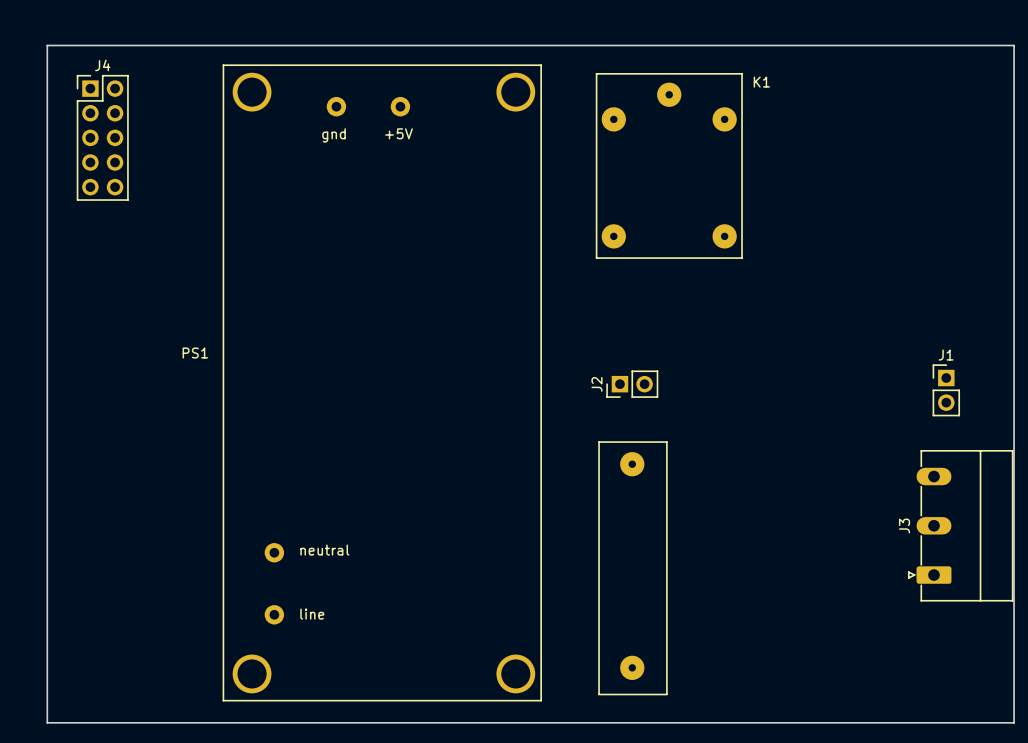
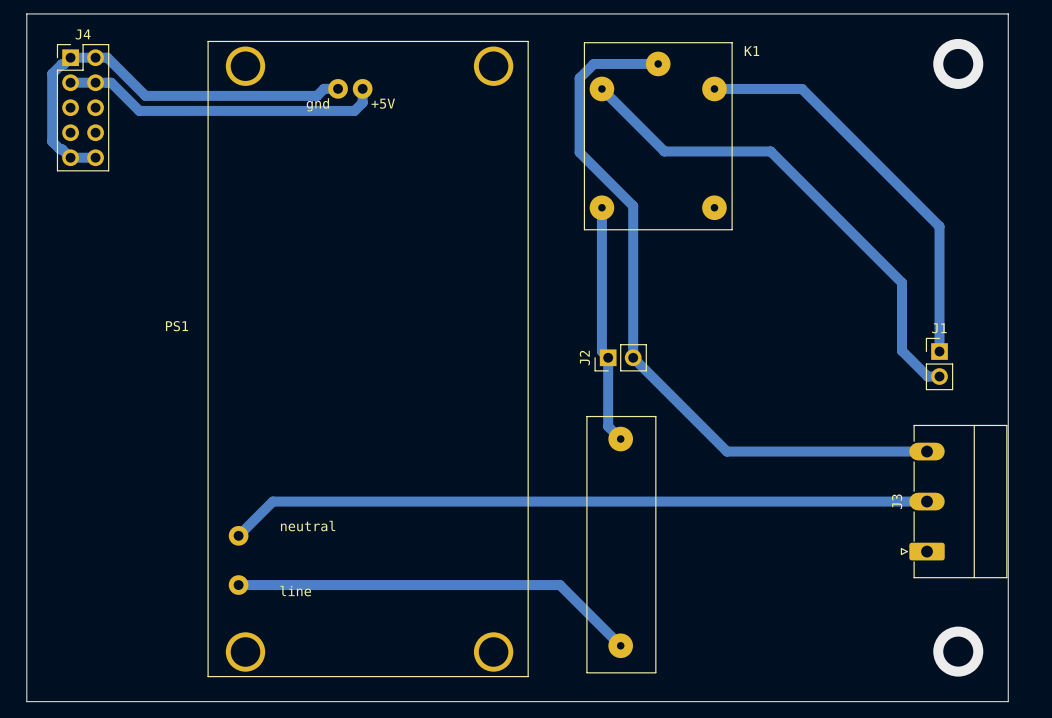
PS1 footprint: [222, 64, 542, 702] -> [207, 40, 529, 678]
bottom track: none -> (658, 63) (593, 63) (579, 78) (579, 152) (633, 205) (633, 357) (726, 451) (927, 451)
via: none -> (958, 63)
bottom track: none -> (70, 82) (111, 82) (139, 110) (354, 110) (362, 102) (362, 88)
bottom track: none -> (338, 88) (324, 88) (317, 95) (145, 95) (107, 57) (70, 57) (52, 73) (52, 141) (70, 157) (95, 157)
bottom track: none -> (601, 88) (664, 151) (770, 151) (902, 282) (902, 350) (927, 376) (939, 376)
bottom track: none -> (714, 88) (801, 88) (939, 226) (939, 351)
bottom track: none -> (601, 207) (601, 351) (608, 357) (608, 426) (620, 439)
bottom track: none -> (927, 501) (272, 501) (238, 535)
bottom track: none -> (238, 585) (559, 585) (620, 645)
via: none -> (958, 651)

